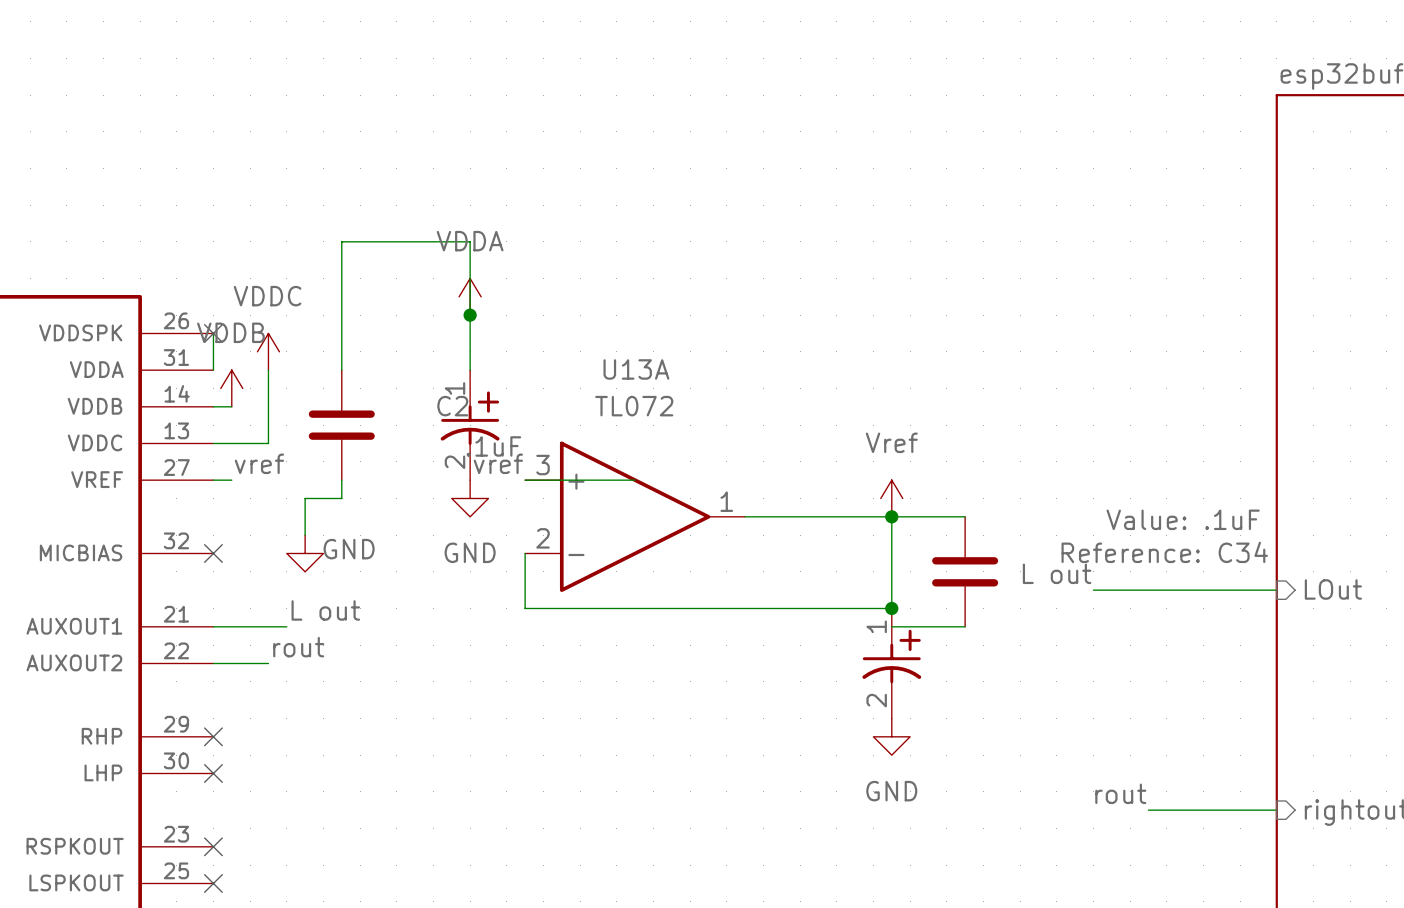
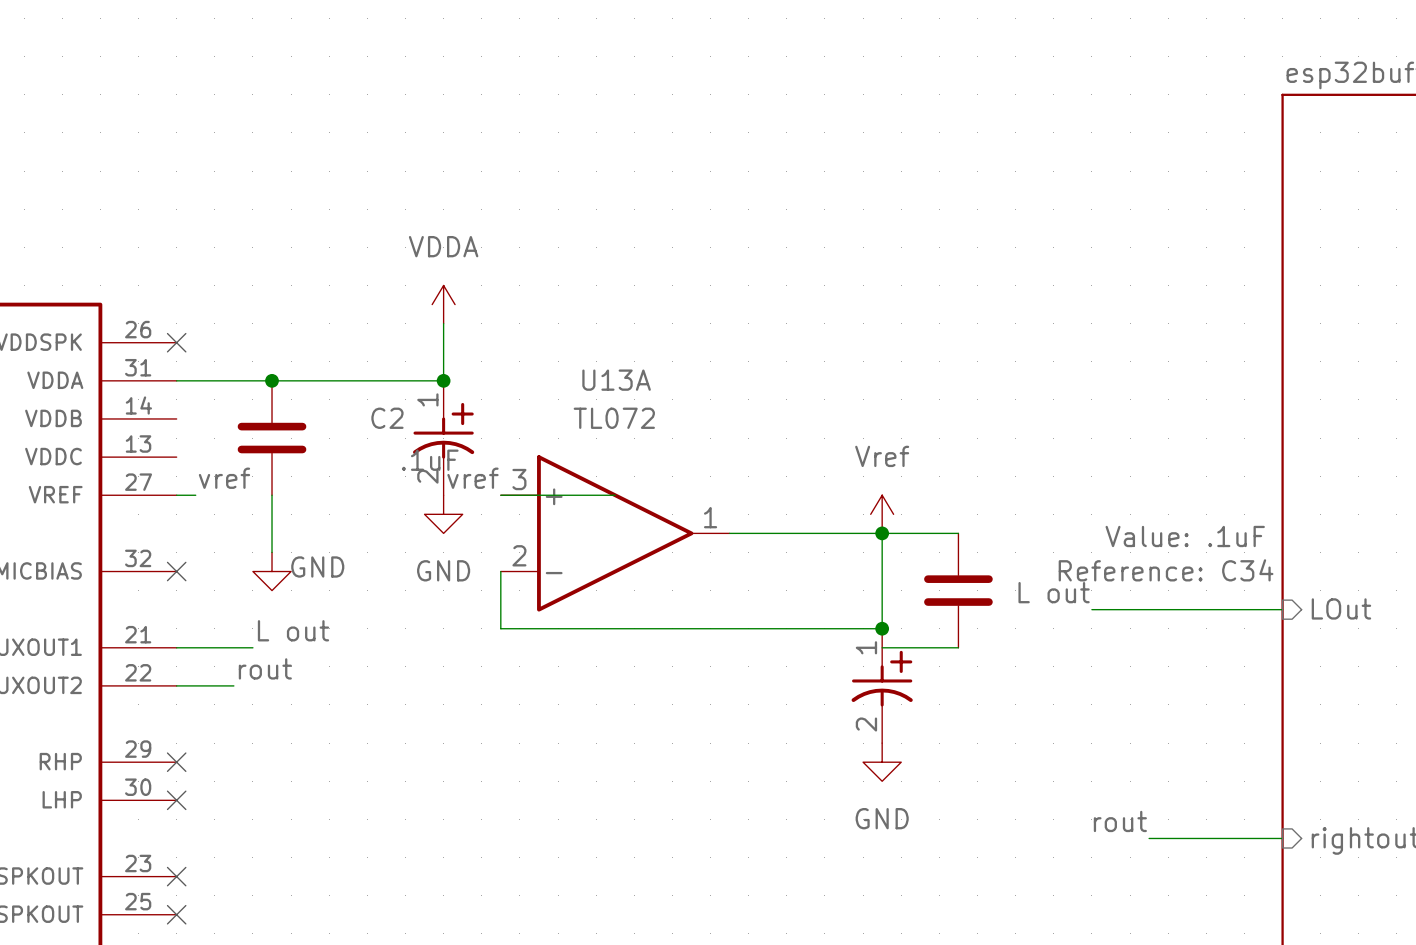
wire: (470, 315) (470, 241) (341, 241) (341, 370) -> none
junction position: (470, 315) -> (443, 380)
wire: (213, 333) (213, 370) -> (443, 380) (176, 380)
power symbol: VDDC (268, 351) -> none
wire: (268, 370) (268, 443) (213, 443) -> none
junction: none -> (272, 380)
power symbol: VDDB (231, 388) -> none
wire: (213, 406) (231, 406) -> none
C2 position: (341, 425) -> (272, 438)
wire: (341, 480) (341, 498) (305, 498) -> (272, 495) (272, 514)

